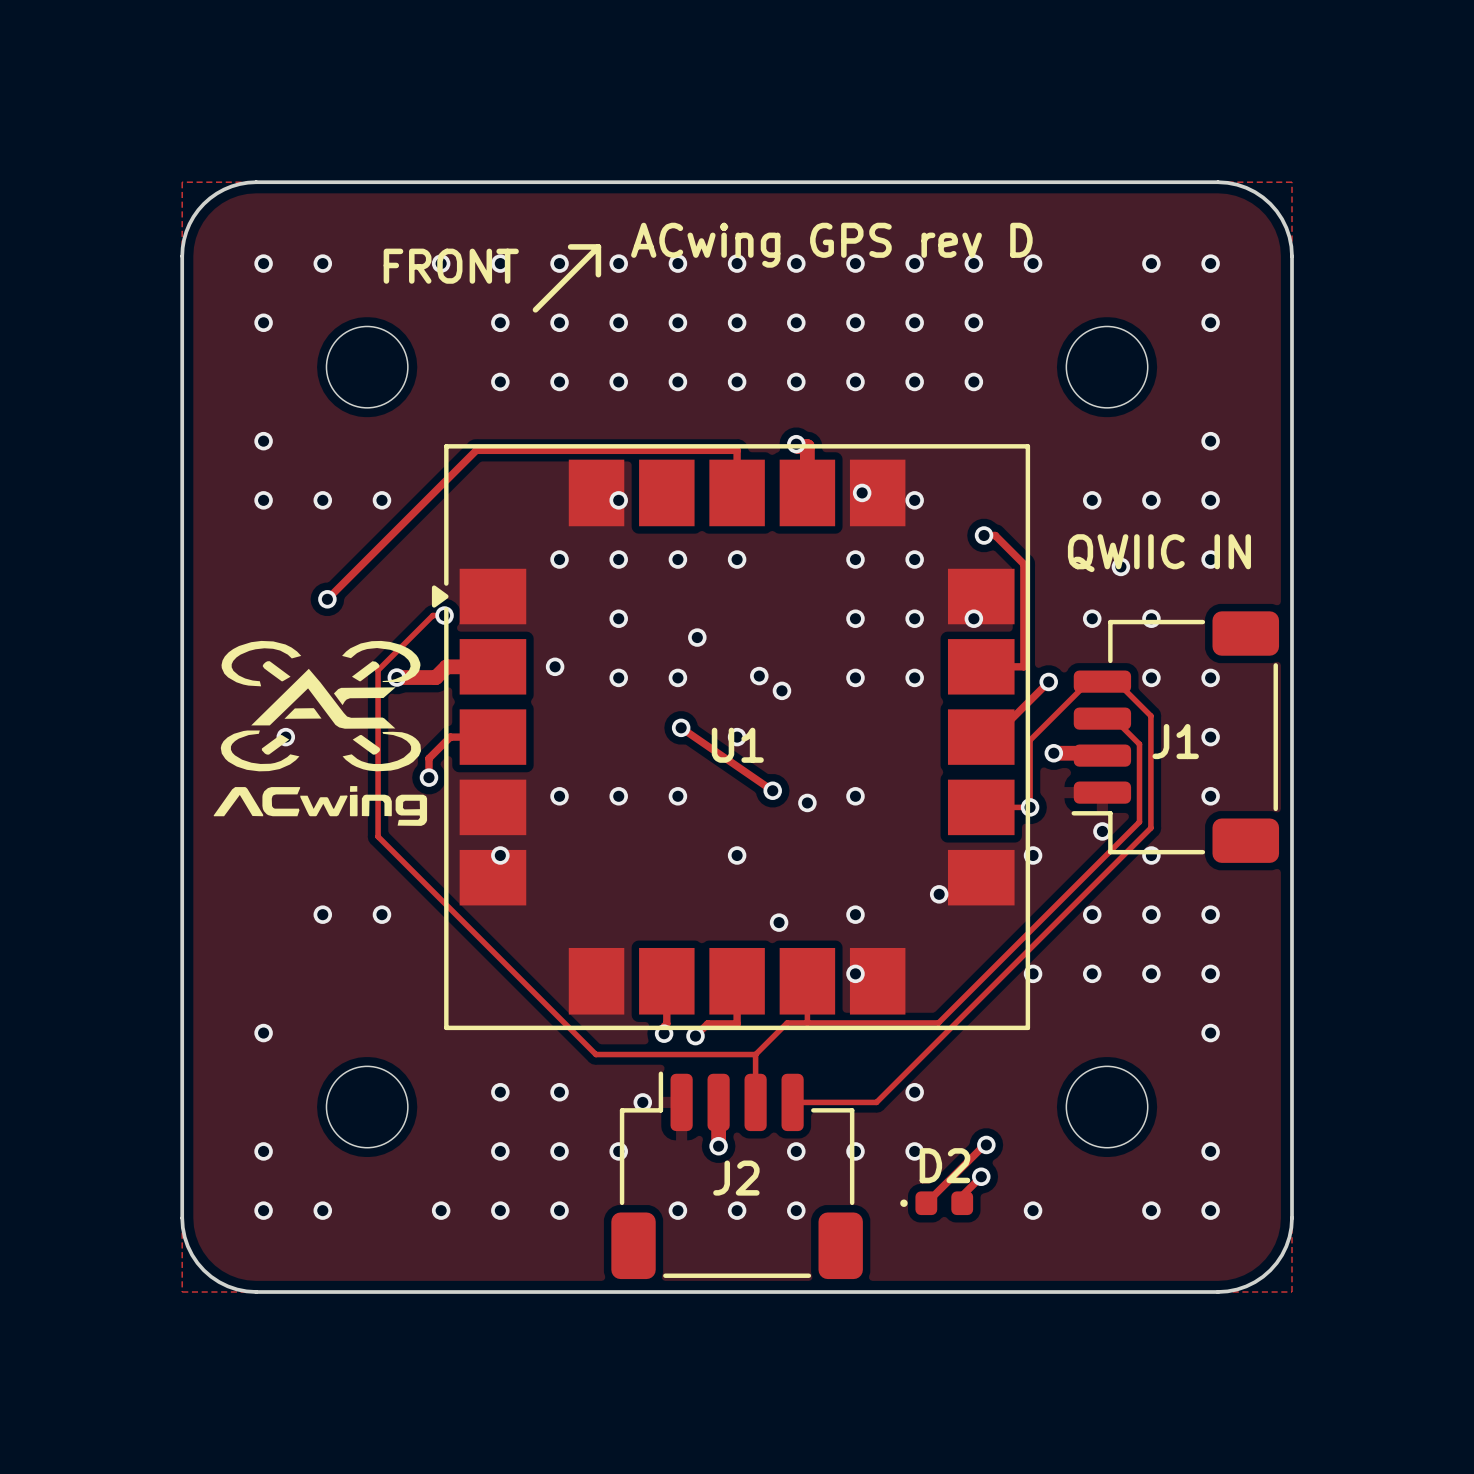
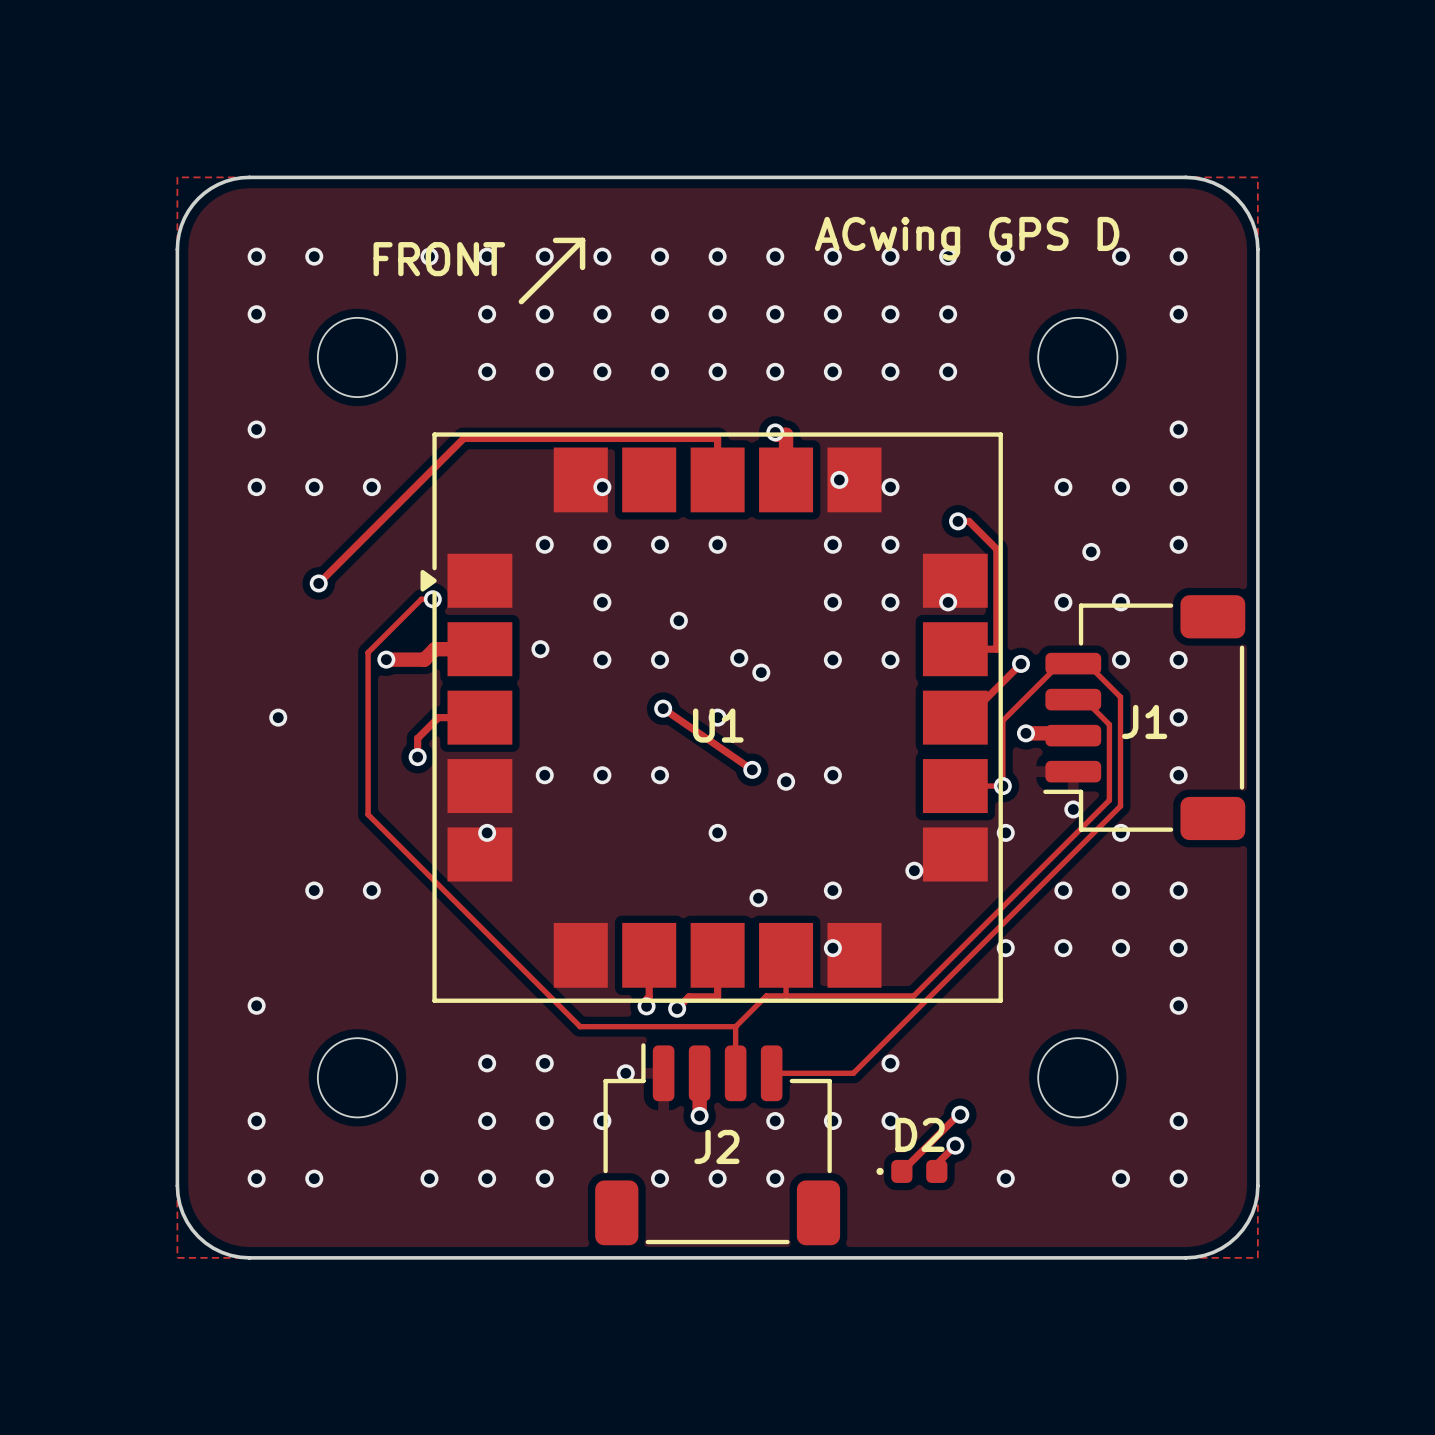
text: ACwing GPS rev D (831, 245) -> ACwing GPS D (967, 238)
text: QWIIC IN (1159, 553) -> none
drawing: [213, 640, 428, 826] -> none

